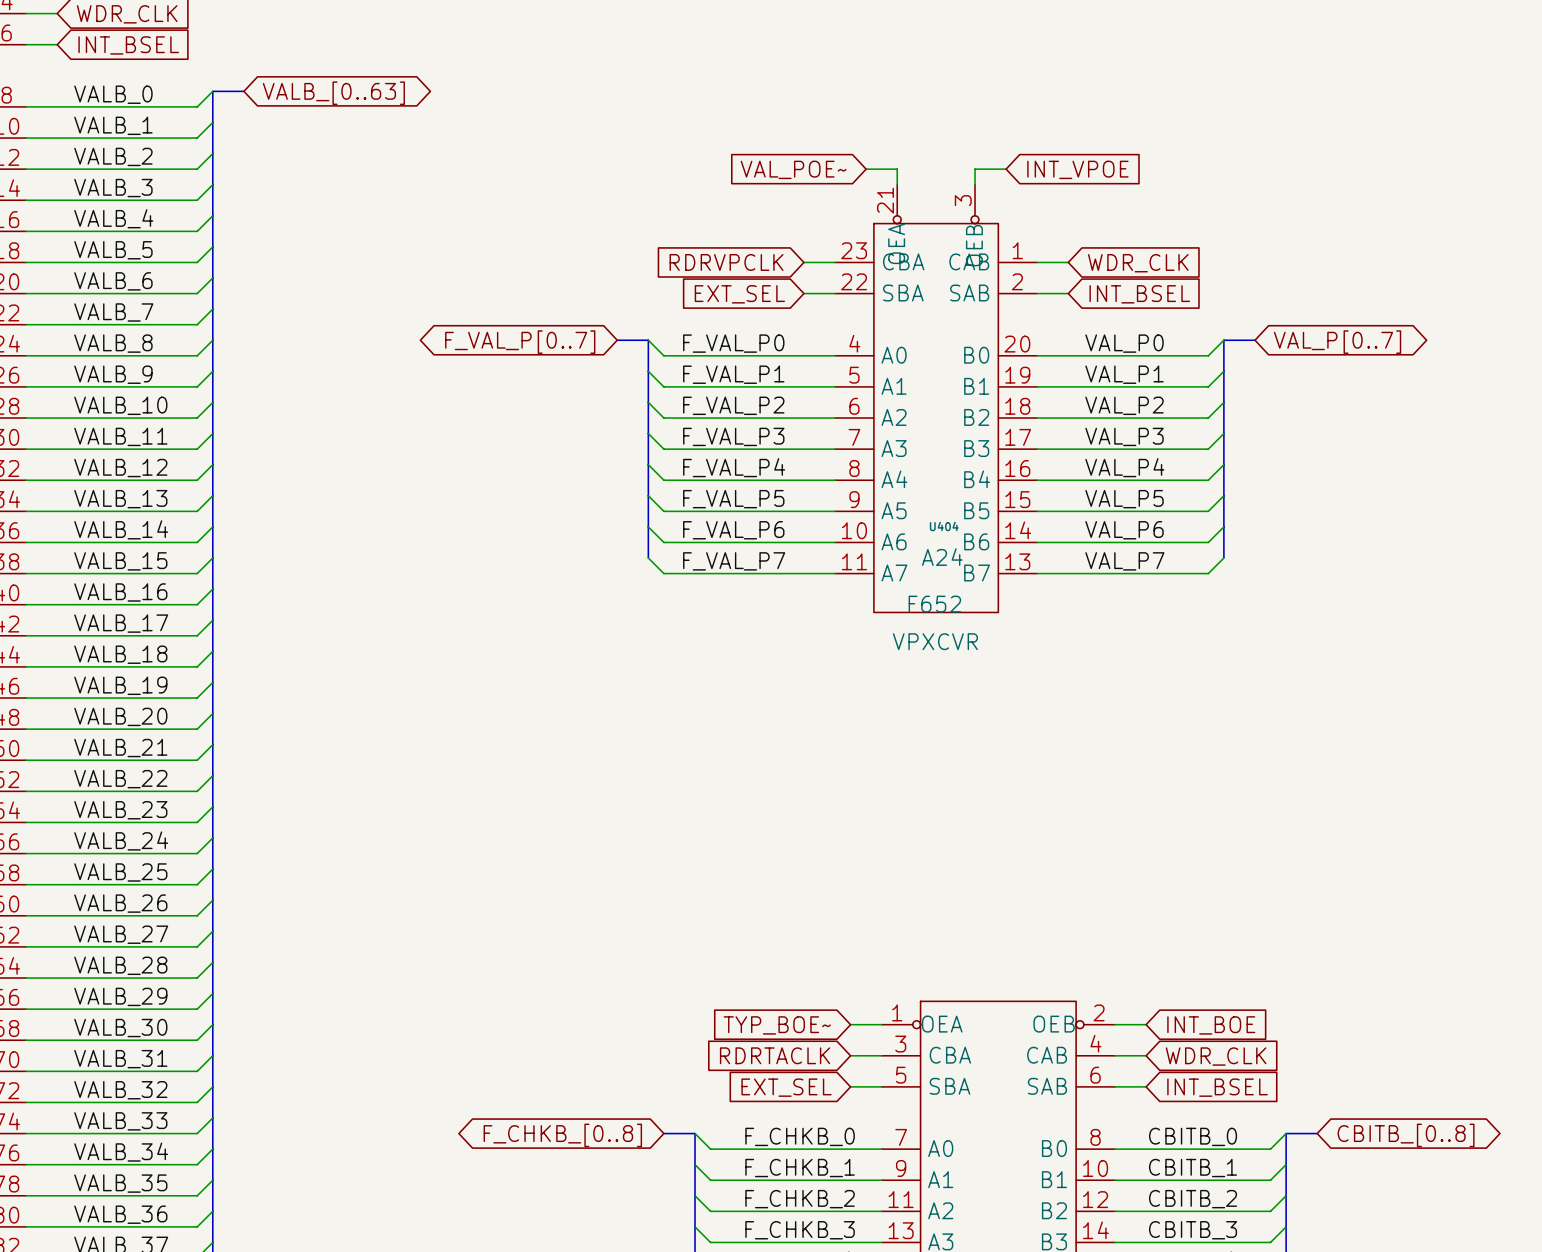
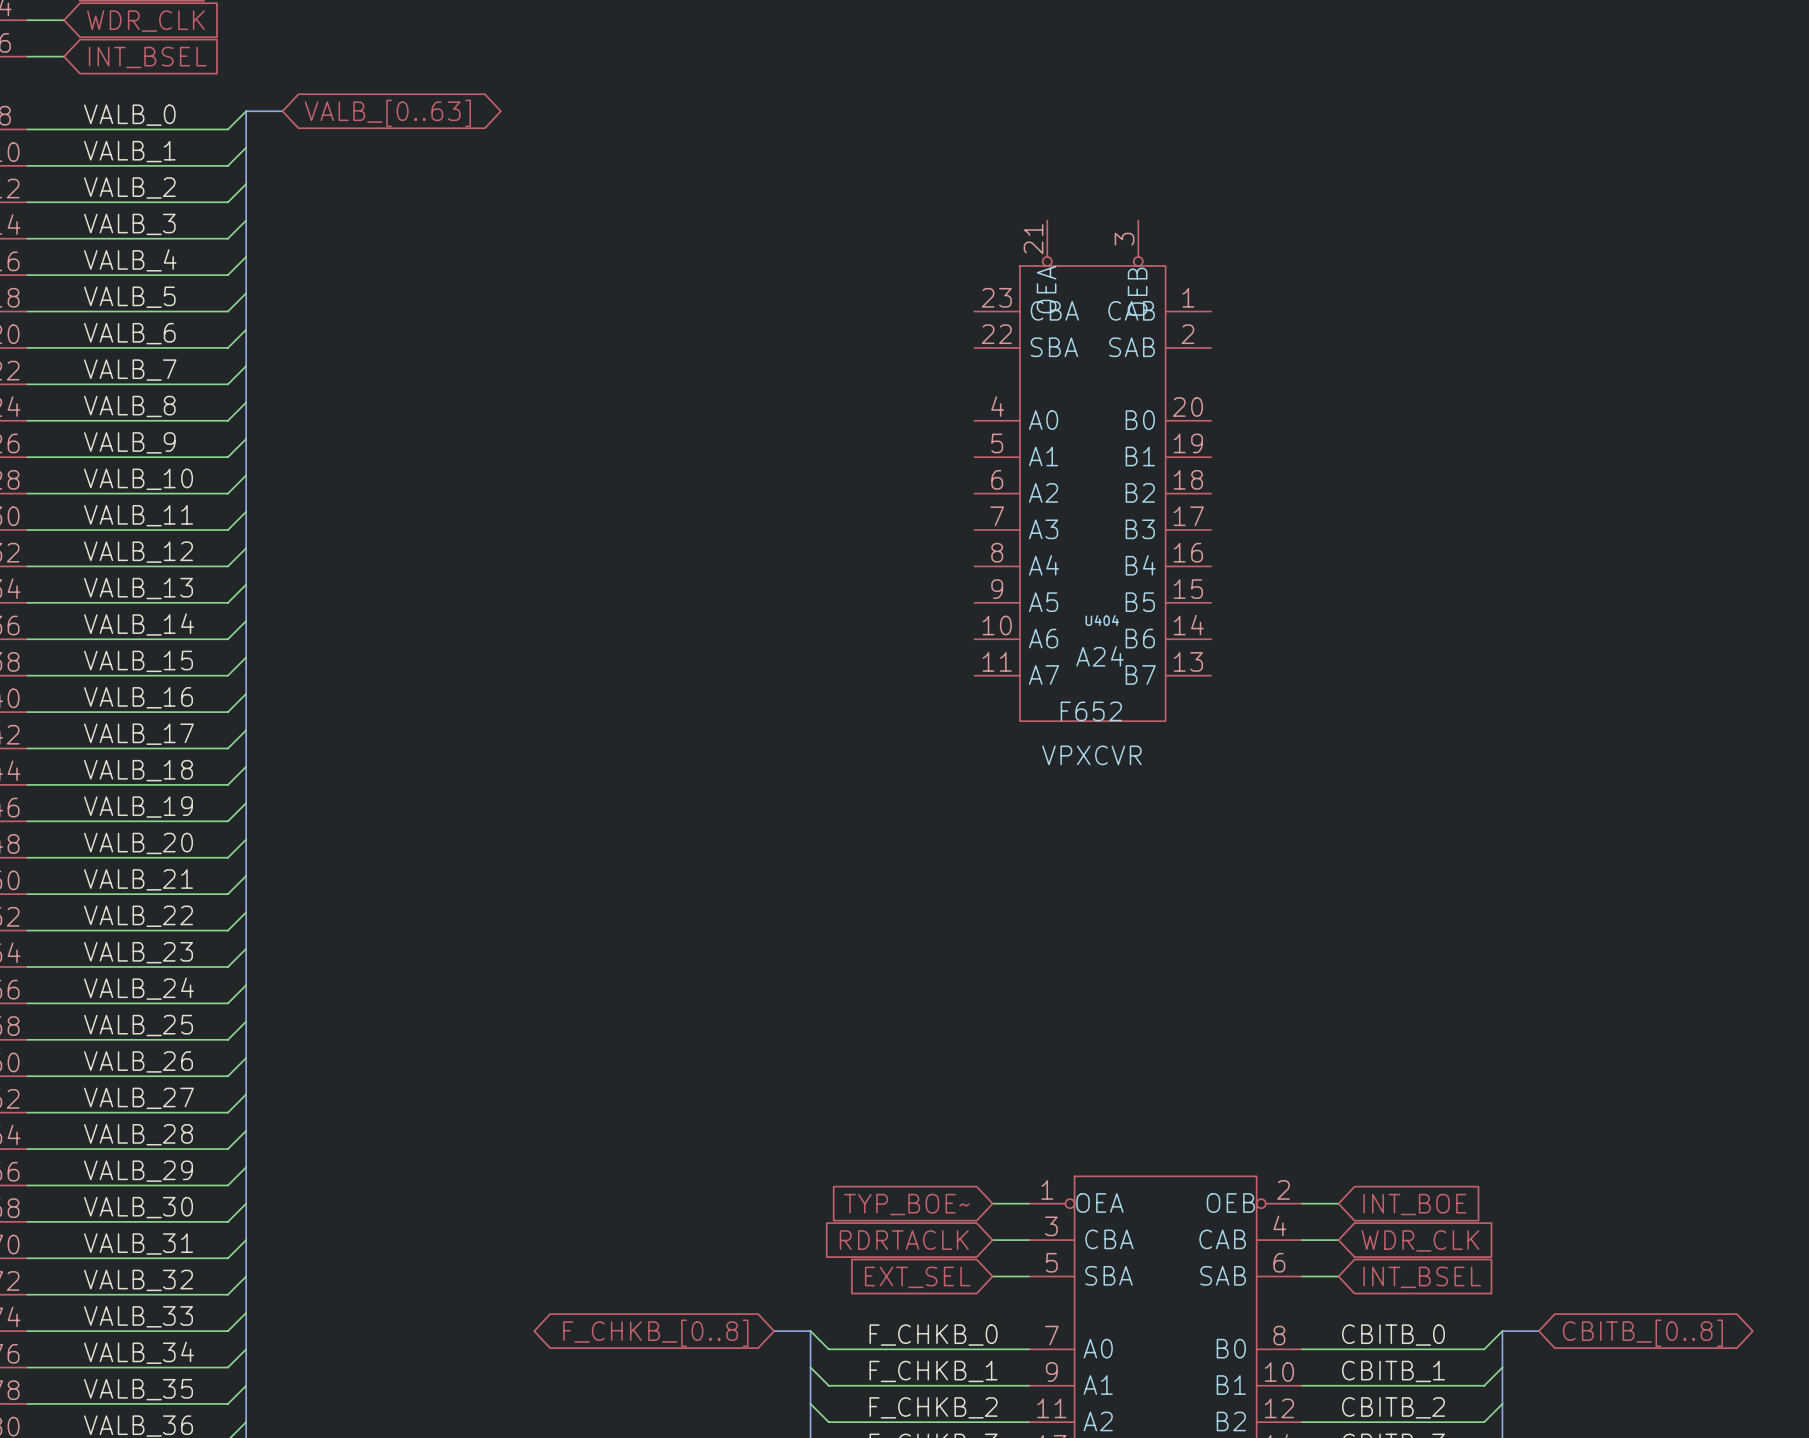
global label: VAL_POE~ (793, 169) -> none
wire: (866, 169) (897, 169) (897, 184) -> none
wire: (1006, 169) (975, 169) (975, 184) -> none
global label: INT_VPOE (1077, 169) -> none
global label: RDRVPCLK (726, 262) -> none
wire: (803, 262) (835, 262) -> none
wire: (1037, 262) (1068, 262) -> none
global label: WDR_CLK (1138, 263) -> none
wire: (803, 293) (835, 293) -> none
wire: (1037, 293) (1068, 293) -> none
global label: EXT_SEL (739, 294) -> none
global label: INT_BSEL (1139, 294) -> none
bus: (617, 340) (648, 340) (648, 558) -> none
wire: (648, 340) (663, 355) (835, 355) -> none
wire: (1223, 340) (1208, 355) (1037, 355) -> none
bus: (1255, 340) (1223, 340) (1223, 558) -> none
global label: F_VAL_P[0..7] (520, 342) -> none
global label: VAL_P[0..7] (1337, 342) -> none
label: F_VAL_P0 (733, 343) -> none
label: VAL_P0 (1124, 343) -> none
wire: (648, 371) (663, 386) (835, 386) -> none
wire: (1223, 371) (1208, 386) (1037, 386) -> none
label: F_VAL_P1 (733, 374) -> none
label: VAL_P1 (1124, 374) -> none
wire: (648, 402) (663, 418) (835, 418) -> none
wire: (1223, 402) (1208, 418) (1037, 418) -> none
label: F_VAL_P2 (733, 405) -> none
label: VAL_P2 (1124, 405) -> none
wire: (648, 433) (663, 449) (835, 449) -> none
wire: (1223, 433) (1208, 449) (1037, 449) -> none
label: F_VAL_P3 (733, 436) -> none
label: VAL_P3 (1124, 436) -> none
wire: (648, 464) (663, 480) (835, 480) -> none
wire: (1223, 464) (1208, 480) (1037, 480) -> none
label: F_VAL_P4 (734, 467) -> none
label: VAL_P4 (1124, 467) -> none
wire: (648, 495) (663, 511) (835, 511) -> none
wire: (1223, 495) (1208, 511) (1037, 511) -> none
label: F_VAL_P5 (733, 499) -> none
label: VAL_P5 (1124, 499) -> none
wire: (648, 526) (663, 542) (835, 542) -> none
wire: (1223, 526) (1208, 542) (1037, 542) -> none
label: F_VAL_P6 (733, 530) -> none
label: VAL_P6 (1124, 530) -> none
wire: (648, 558) (663, 573) (835, 573) -> none
wire: (1223, 558) (1208, 573) (1037, 573) -> none
label: F_VAL_P7 (734, 561) -> none
label: VAL_P7 (1124, 561) -> none

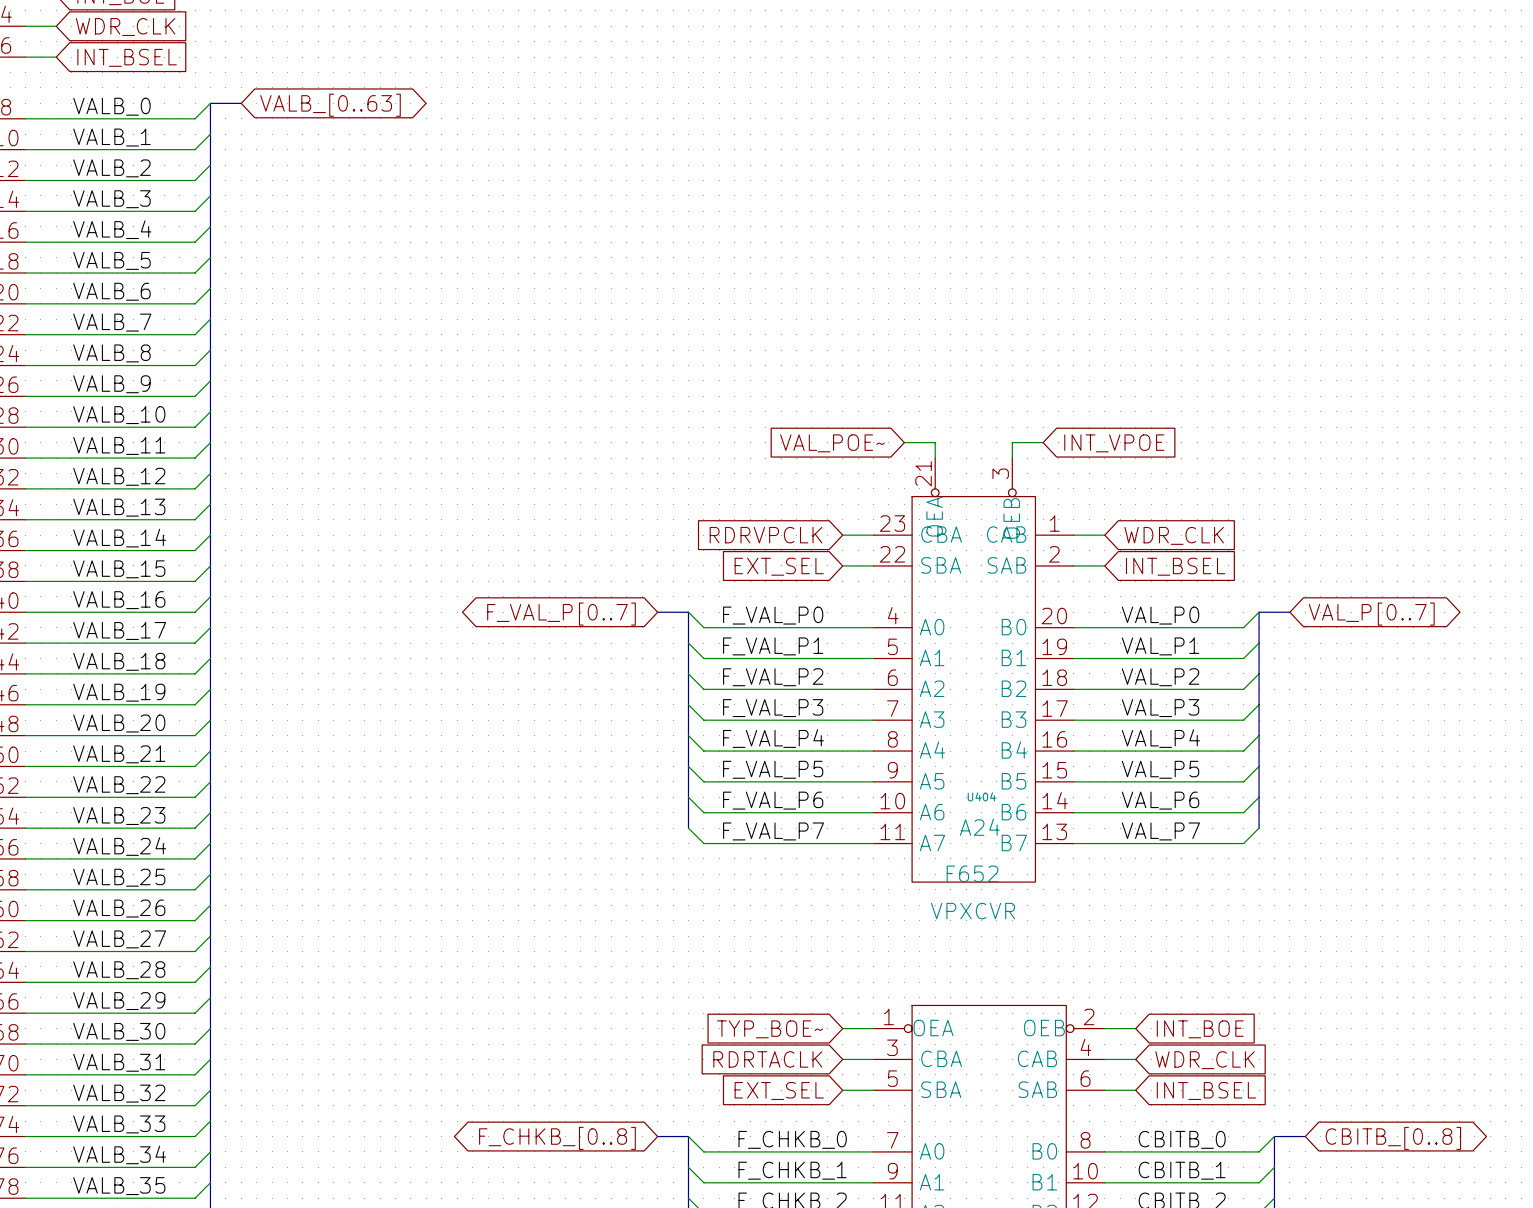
U404 position: (1092, 470) -> (973, 670)
wire: none -> (904, 442) (935, 442) (935, 458)
wire: none -> (1043, 442) (1012, 442) (1012, 458)
global label: none -> VAL_POE~ (832, 443)
global label: none -> INT_VPOE (1114, 443)
global label: none -> RDRVPCLK (765, 535)
wire: none -> (842, 535) (873, 535)
wire: none -> (1073, 535) (1104, 535)
global label: none -> WDR_CLK (1174, 535)
wire: none -> (842, 565) (873, 565)
wire: none -> (1073, 565) (1104, 565)
global label: none -> EXT_SEL (779, 566)
global label: none -> INT_BSEL (1175, 566)
bus: none -> (657, 612) (688, 612) (688, 828)
wire: none -> (688, 612) (703, 627) (873, 627)
wire: none -> (1259, 612) (1243, 627) (1073, 627)
bus: none -> (1289, 612) (1259, 612) (1259, 828)
global label: none -> F_VAL_P[0..7] (561, 614)
global label: none -> VAL_P[0..7] (1371, 614)
label: none -> F_VAL_P0 (773, 615)
label: none -> VAL_P0 (1160, 615)
wire: none -> (688, 643) (703, 658) (873, 658)
wire: none -> (1259, 643) (1243, 658) (1073, 658)
label: none -> F_VAL_P1 (773, 646)
label: none -> VAL_P1 (1160, 646)
wire: none -> (688, 673) (703, 689) (873, 689)
wire: none -> (1259, 673) (1243, 689) (1073, 689)
label: none -> F_VAL_P2 (773, 677)
label: none -> VAL_P2 (1160, 677)
wire: none -> (688, 704) (703, 720) (873, 720)
wire: none -> (1259, 704) (1243, 720) (1073, 720)
label: none -> F_VAL_P3 (773, 708)
label: none -> VAL_P3 (1160, 708)
wire: none -> (688, 735) (703, 751) (873, 751)
wire: none -> (1259, 735) (1243, 751) (1073, 751)
label: none -> F_VAL_P4 (773, 738)
label: none -> VAL_P4 (1160, 738)
wire: none -> (688, 766) (703, 781) (873, 781)
wire: none -> (1259, 766) (1243, 781) (1073, 781)
label: none -> F_VAL_P5 (773, 769)
label: none -> VAL_P5 (1160, 769)
wire: none -> (688, 797) (703, 812) (873, 812)
wire: none -> (1259, 797) (1243, 812) (1073, 812)
label: none -> F_VAL_P6 (773, 800)
label: none -> VAL_P6 (1160, 800)
wire: none -> (688, 828) (703, 843) (873, 843)
wire: none -> (1259, 828) (1243, 843) (1073, 843)
label: none -> F_VAL_P7 (773, 831)
label: none -> VAL_P7 (1160, 831)

